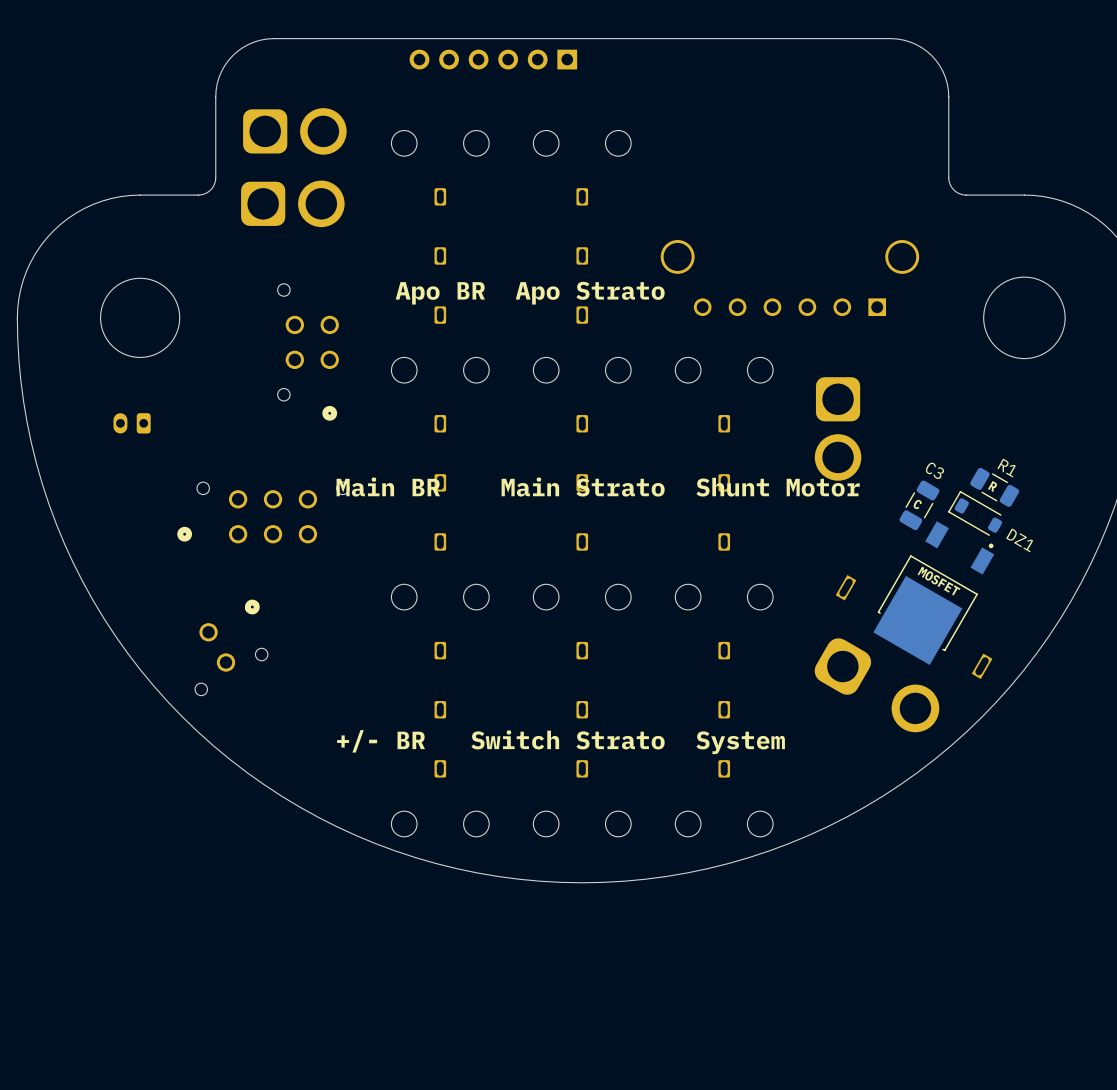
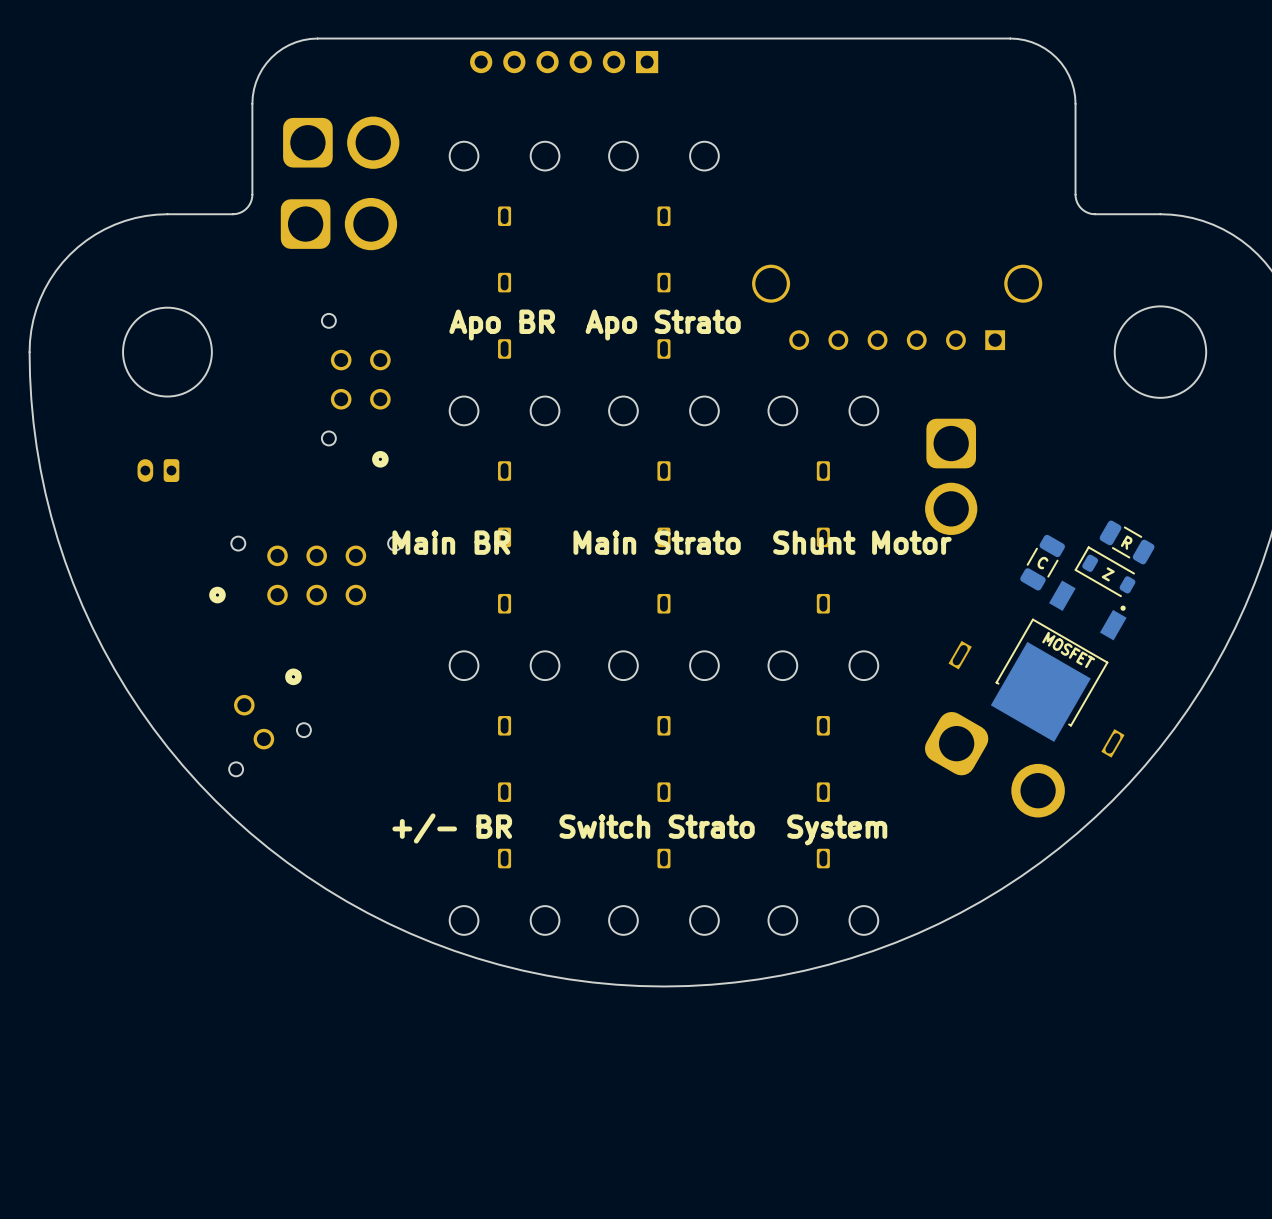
text: R1 (1006, 468) -> none
text: C3 (934, 470) -> none
text: none -> Z (1108, 574)
text: DZ1 (1019, 540) -> none

